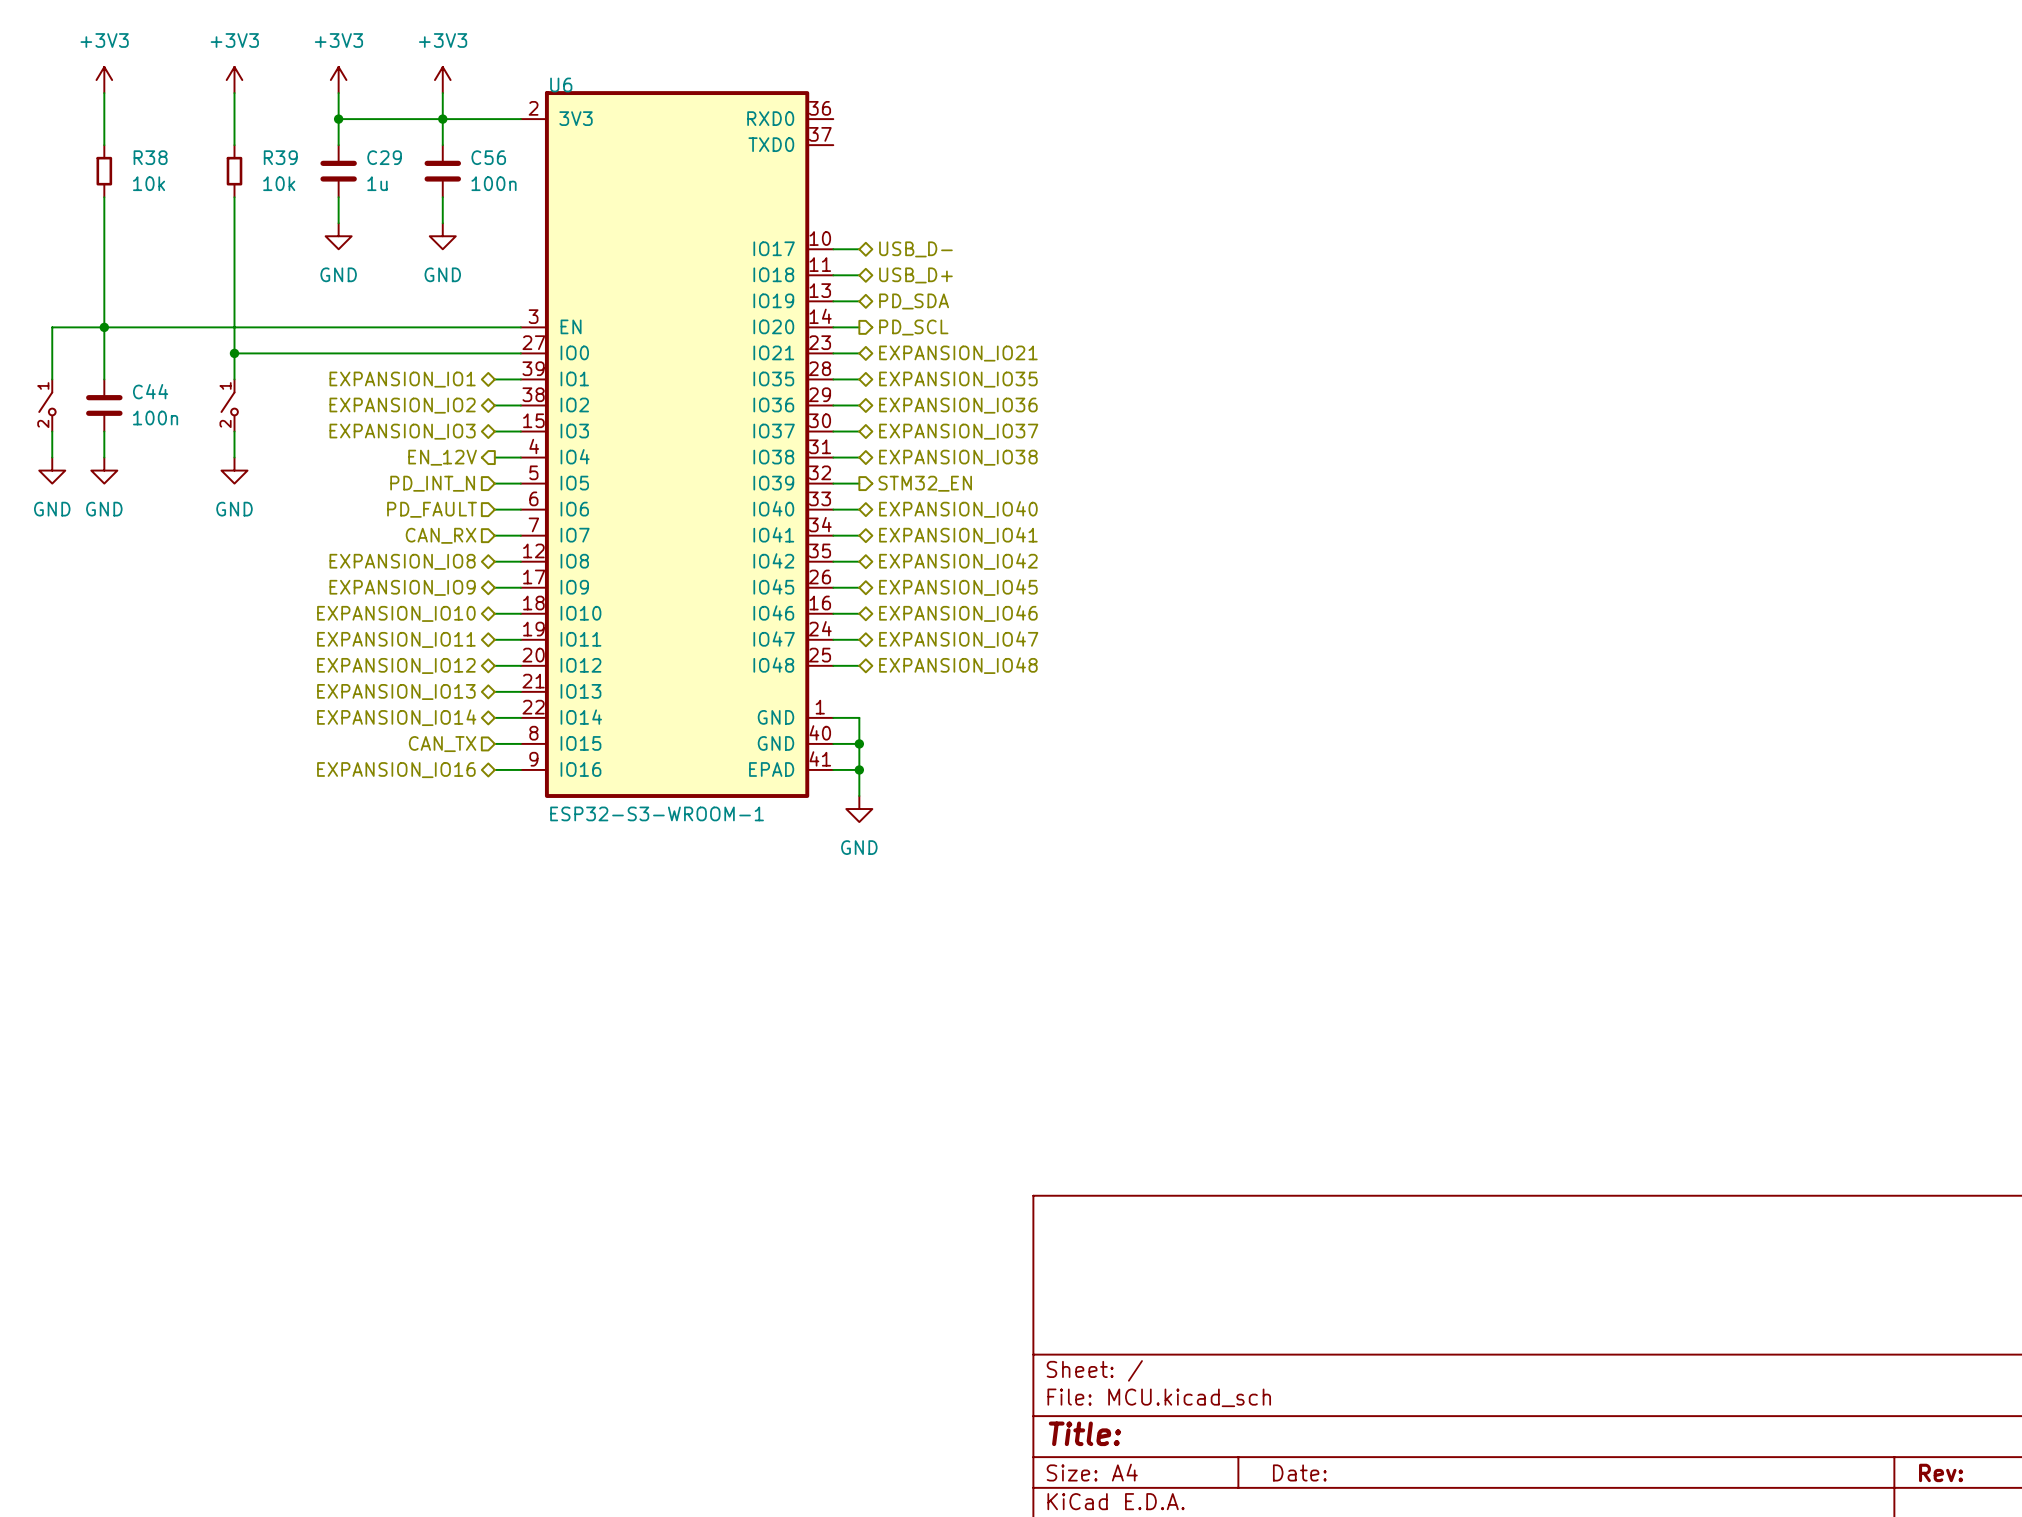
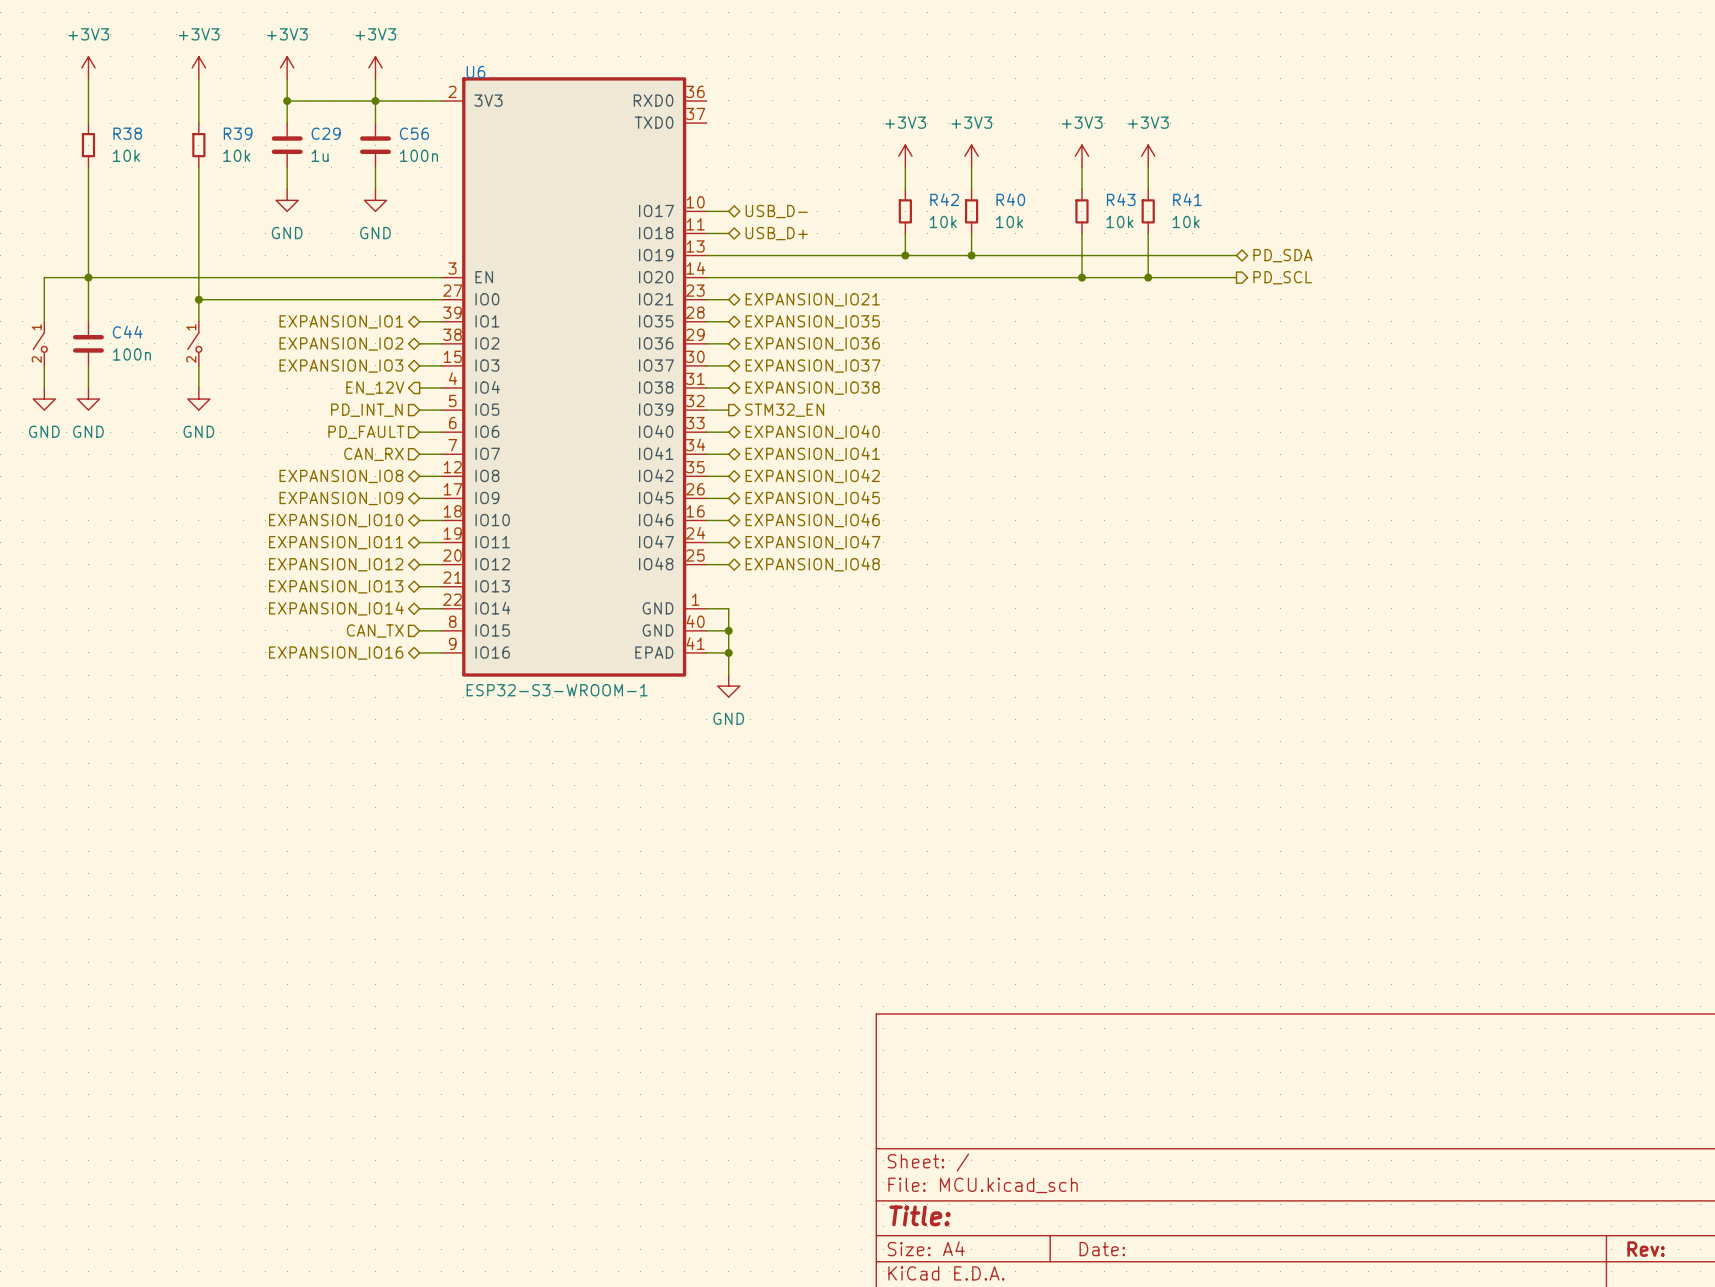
power symbol: none -> +3V3 (905, 156)
power symbol: none -> +3V3 (971, 156)
power symbol: none -> +3V3 (1081, 156)
power symbol: none -> +3V3 (1148, 156)
wire: none -> (905, 167) (905, 189)
wire: none -> (971, 167) (971, 189)
wire: none -> (1081, 167) (1081, 189)
wire: none -> (1148, 167) (1148, 189)
R42: none -> 10k (905, 211)
R40: none -> 10k (971, 211)
R43: none -> 10k (1081, 211)
R41: none -> 10k (1148, 211)
wire: none -> (905, 233) (905, 255)
wire: none -> (971, 233) (971, 255)
wire: none -> (1081, 233) (1081, 277)
wire: none -> (1148, 233) (1148, 277)
wire: none -> (728, 255) (1236, 255)
hierarchical label: PD_SDA (914, 301) -> none
junction: none -> (905, 255)
junction: none -> (971, 255)
hierarchical label: none -> PD_SDA (1282, 255)
wire: none -> (728, 277) (1236, 277)
hierarchical label: PD_SCL (913, 327) -> none
junction: none -> (1081, 277)
junction: none -> (1148, 277)
hierarchical label: none -> PD_SCL (1282, 277)

